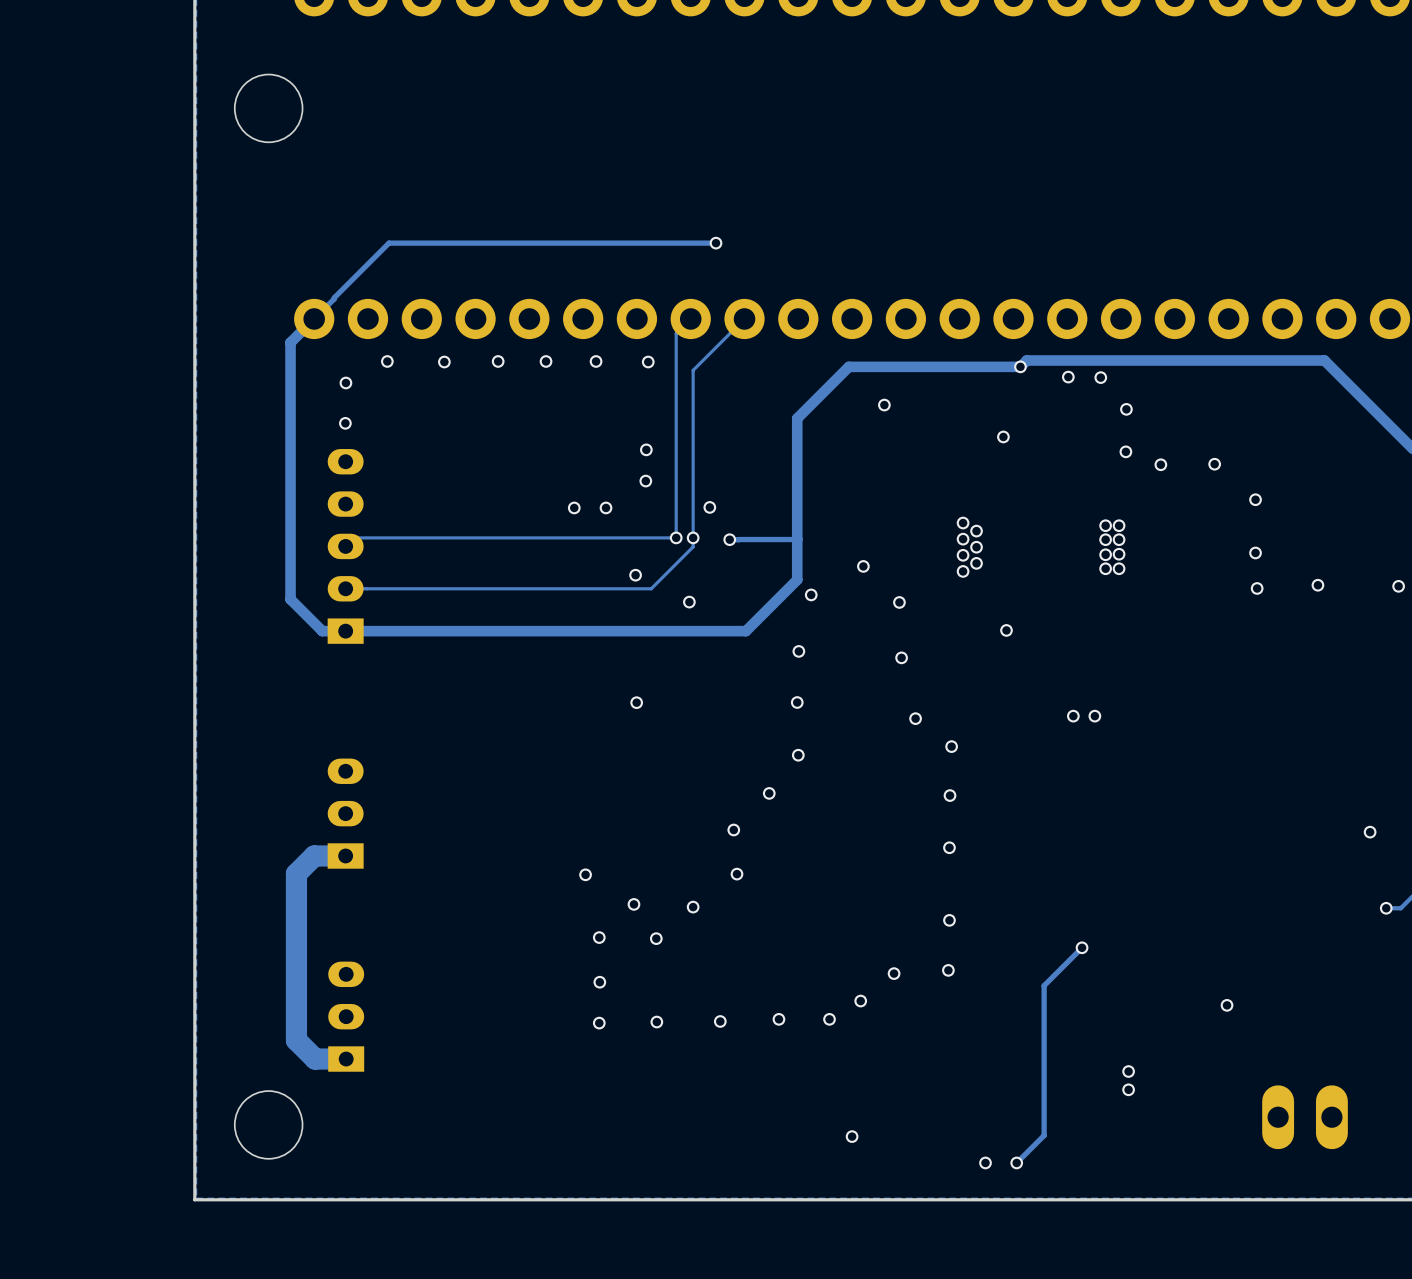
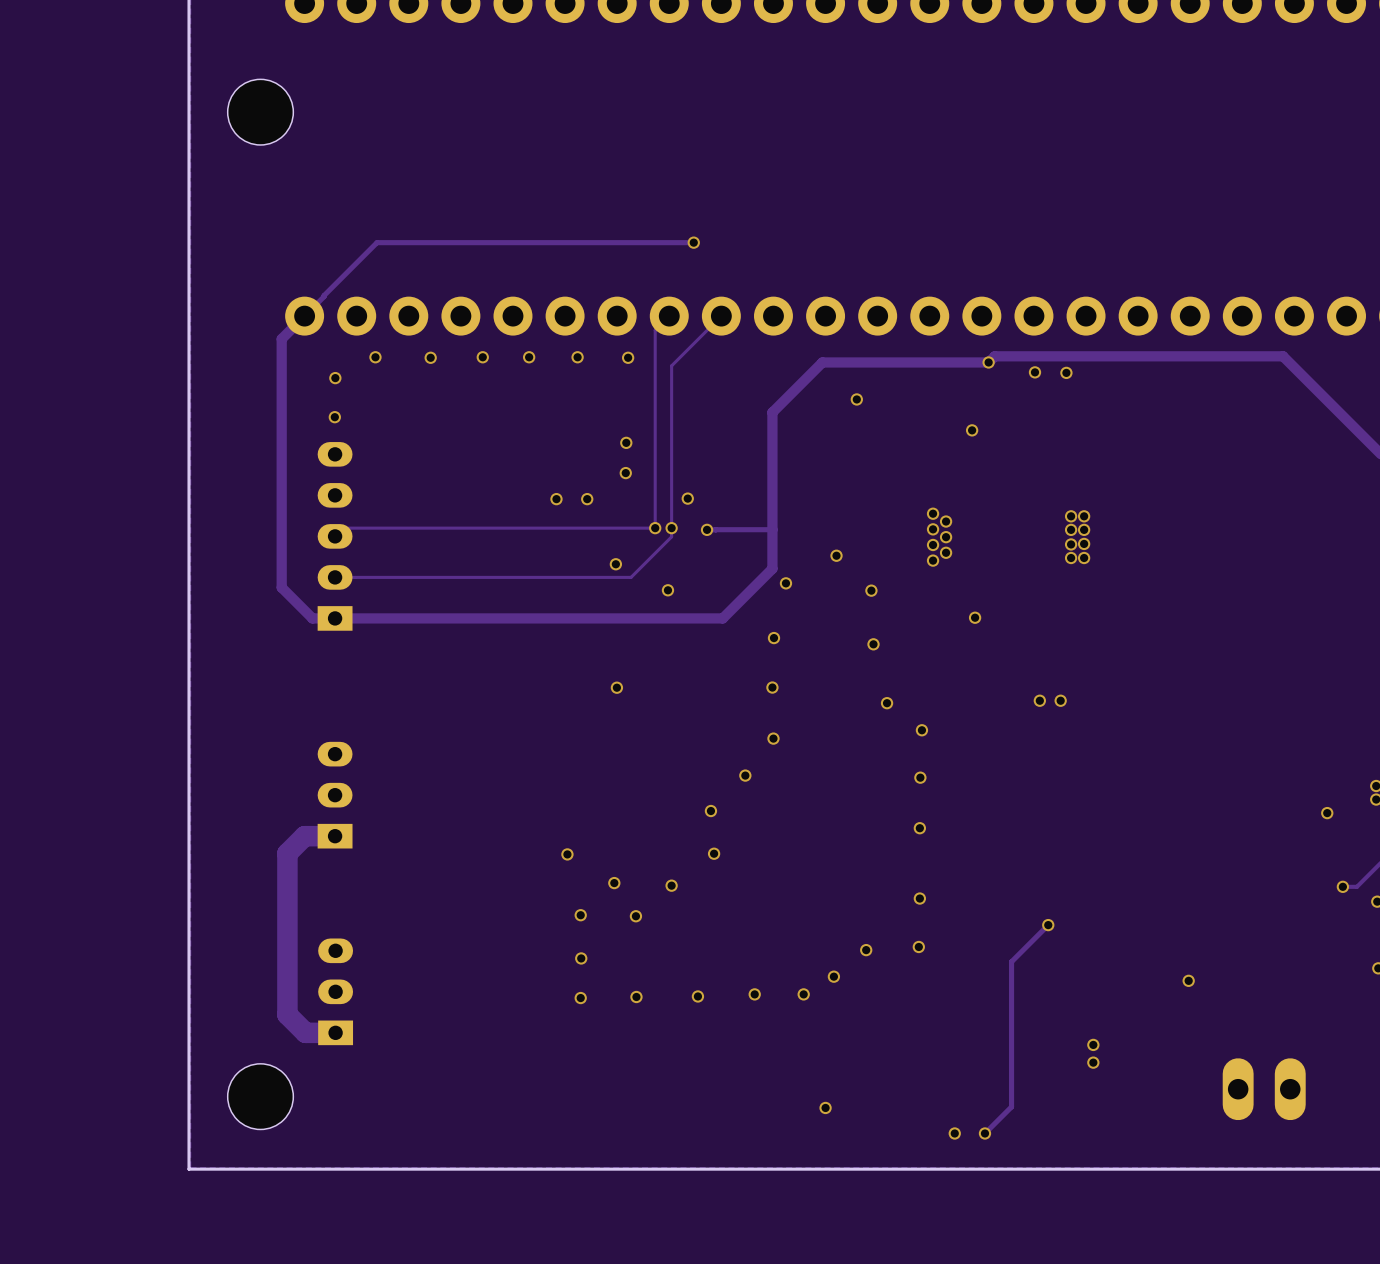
via: (1126, 409) -> none
via: (1125, 451) -> none
via: (1160, 464) -> none
via: (1214, 464) -> none
via: (1255, 499) -> none
via: (1255, 552) -> none
via: (1317, 585) -> none
via: (1398, 586) -> none
via: (1257, 588) -> none

